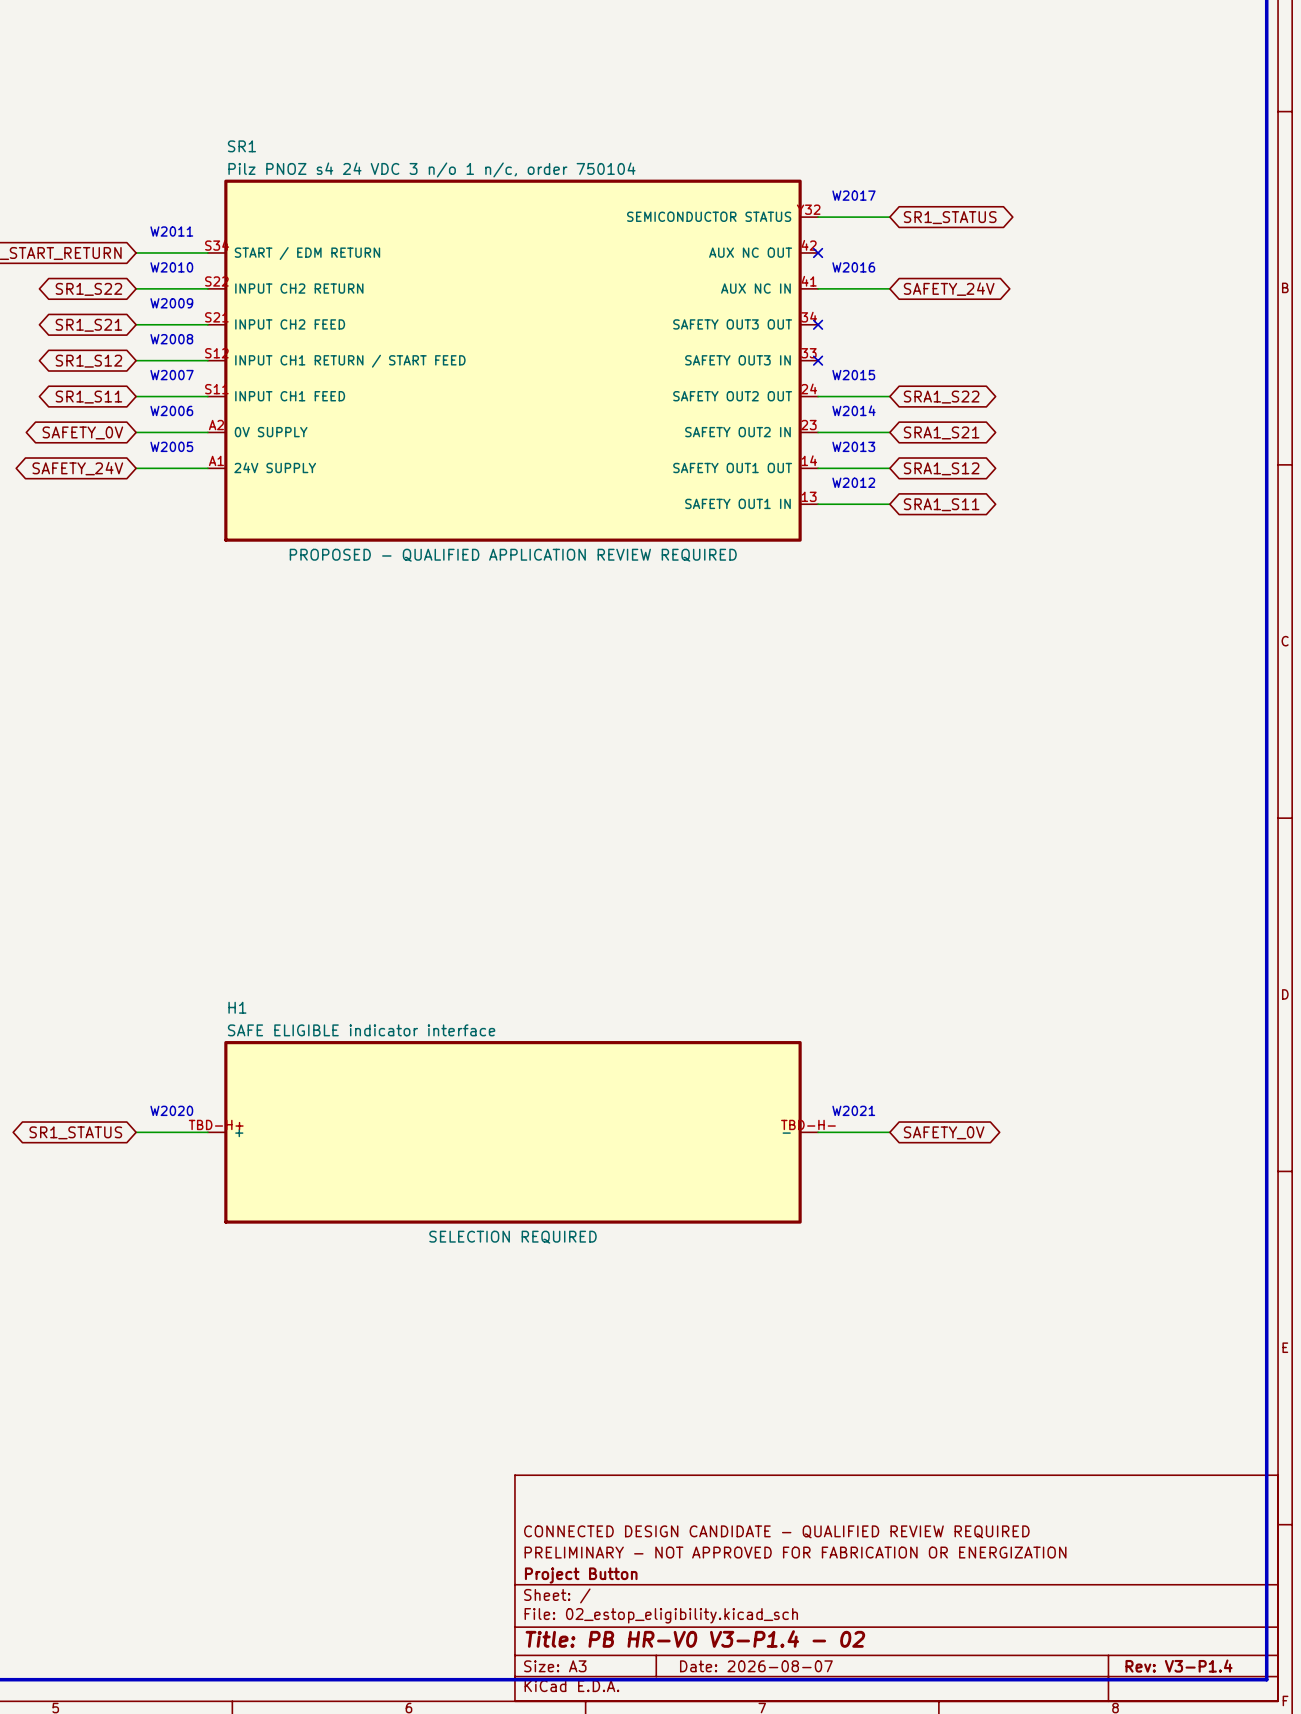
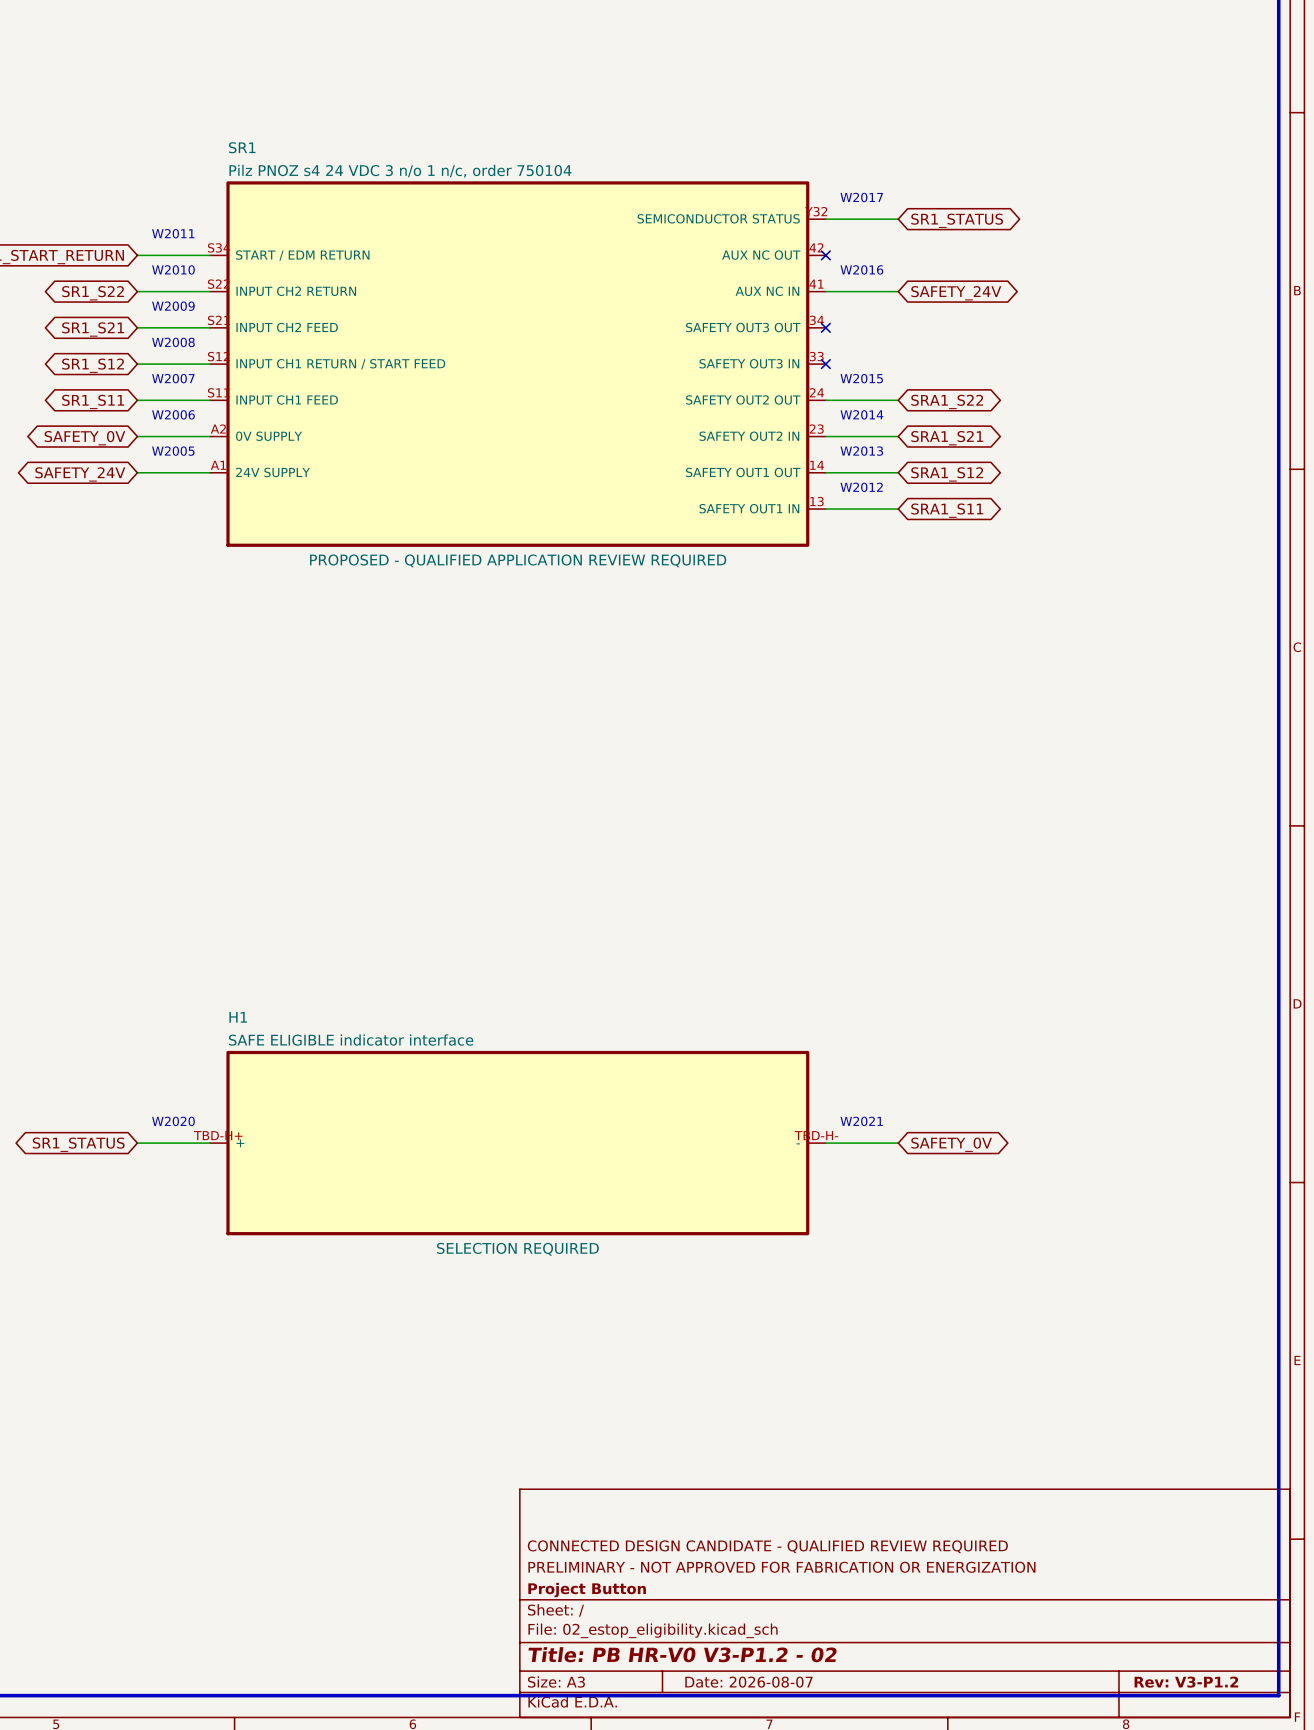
title block: Title: PB HR-V0 V3-P1.4 - 02 (695, 1638) -> Title: PB HR-V0 V3-P1.2 - 02 (682, 1654)
title block: Rev: V3-P1.4 (1179, 1666) -> Rev: V3-P1.2 (1186, 1682)

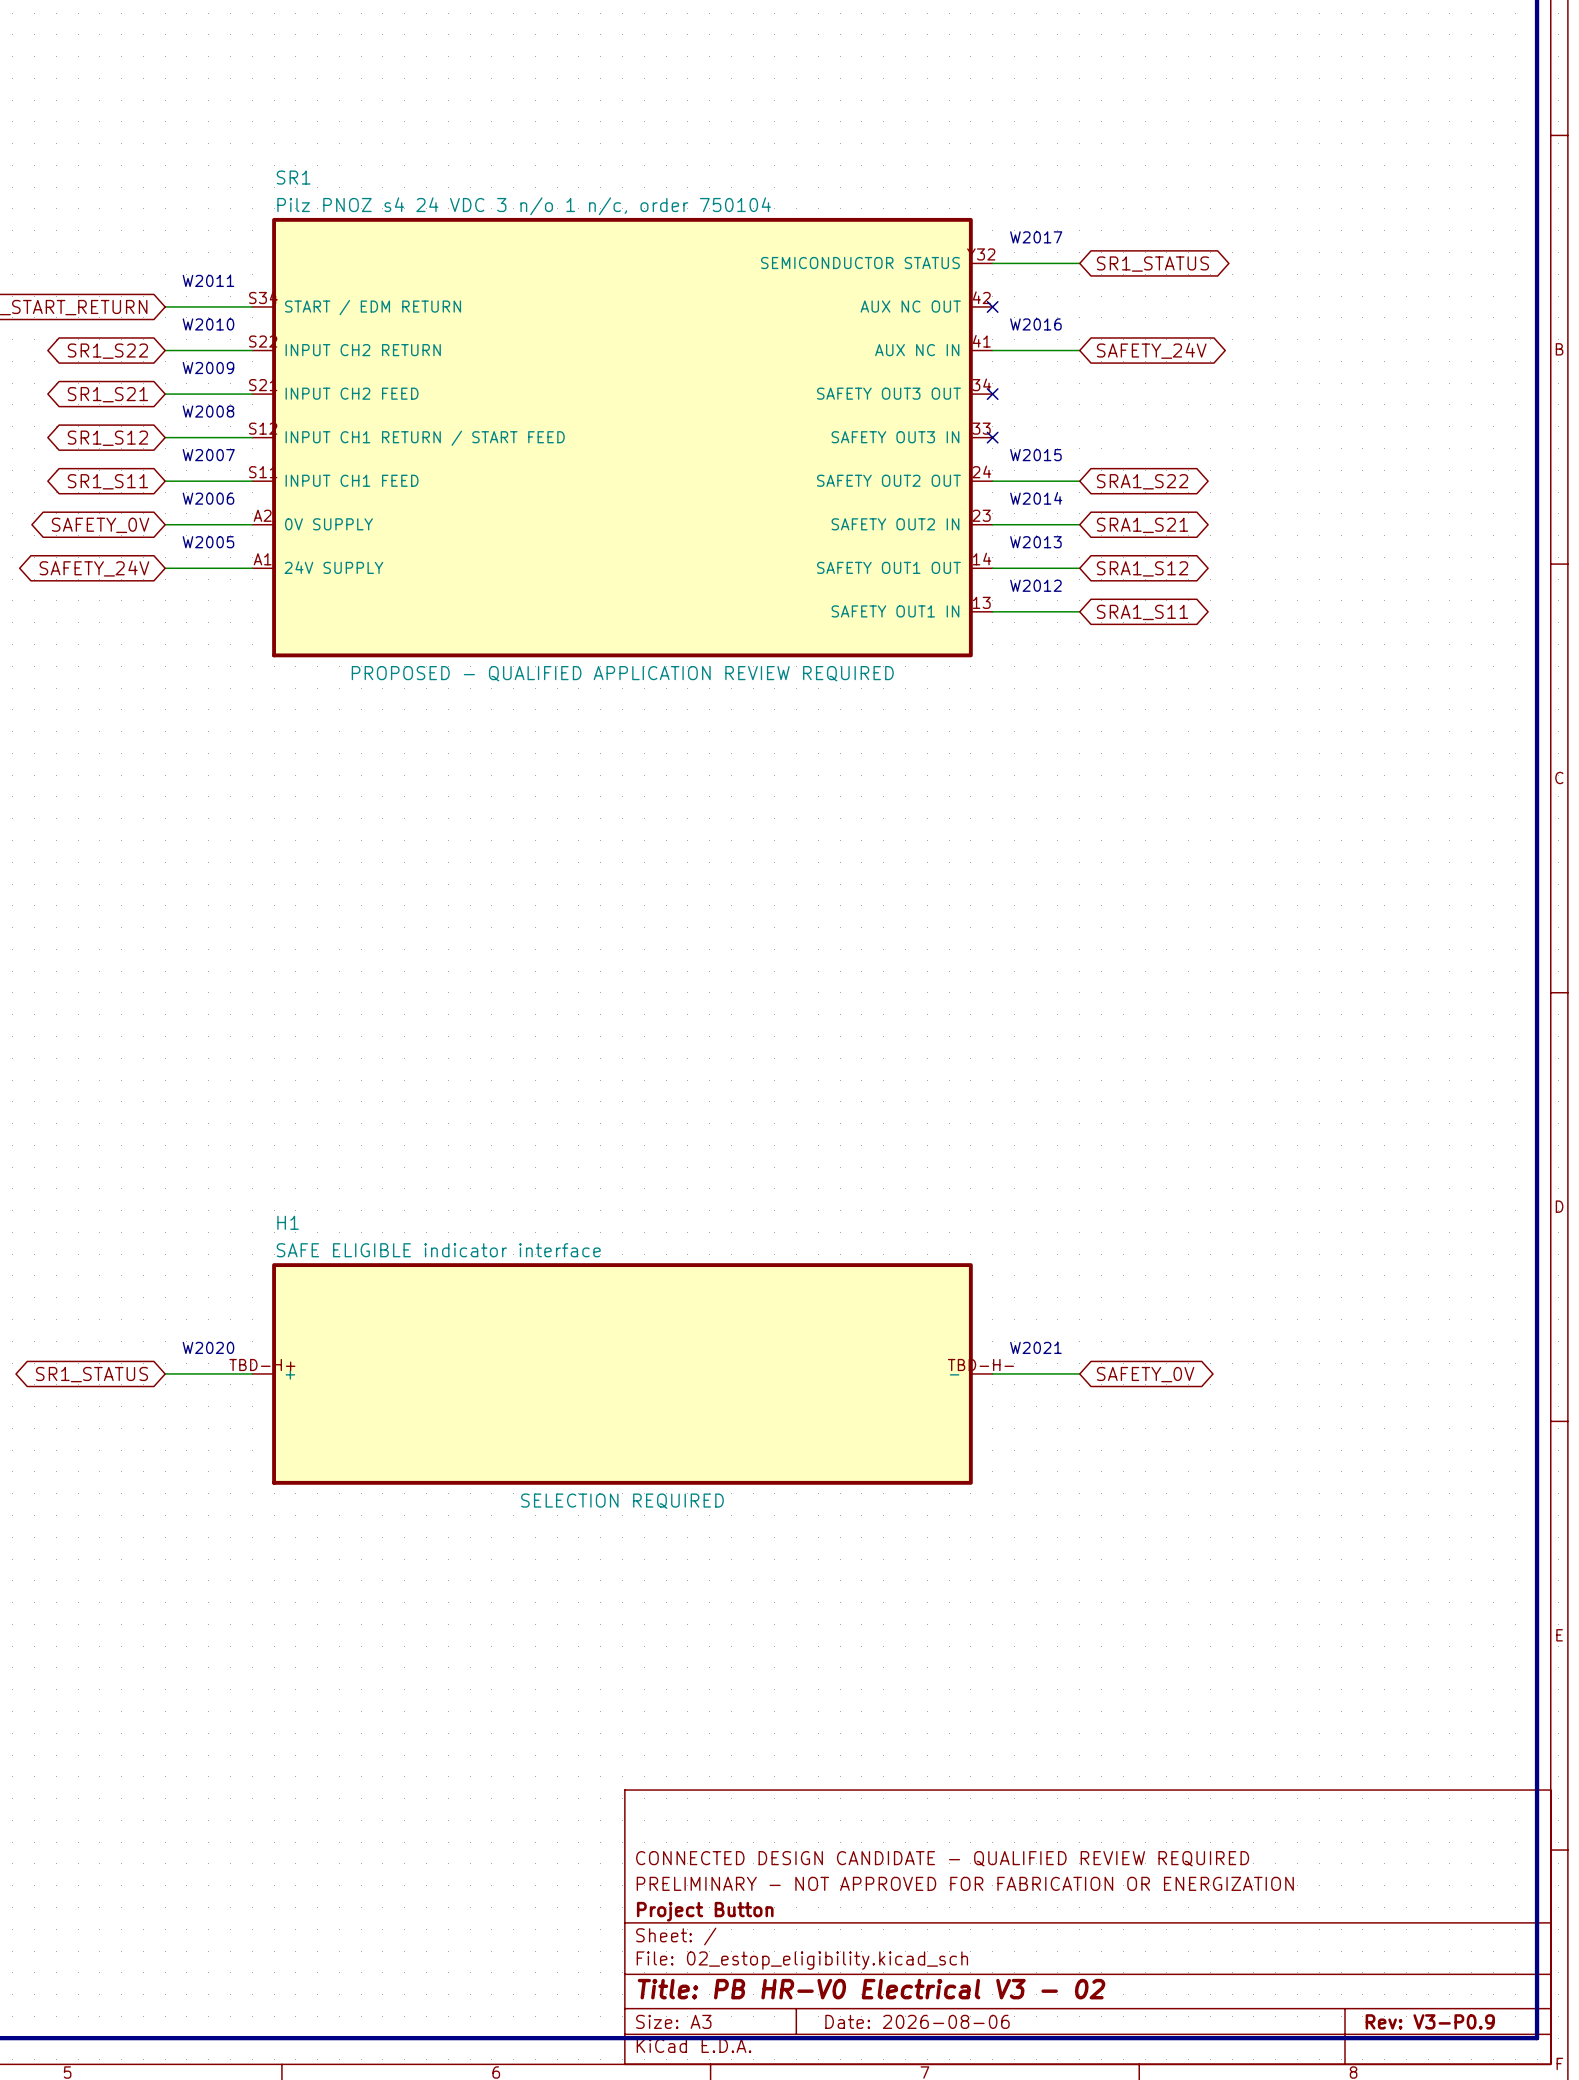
title block: Title: PB HR-V0 V3-P1.2 - 02 (682, 1654) -> Title: PB HR-V0 Electrical V3 - 02 (871, 1989)
title block: Date: 2026-08-07 (748, 1682) -> Date: 2026-08-06 (917, 2021)
title block: Rev: V3-P1.2 (1186, 1682) -> Rev: V3-P0.9 (1430, 2021)

